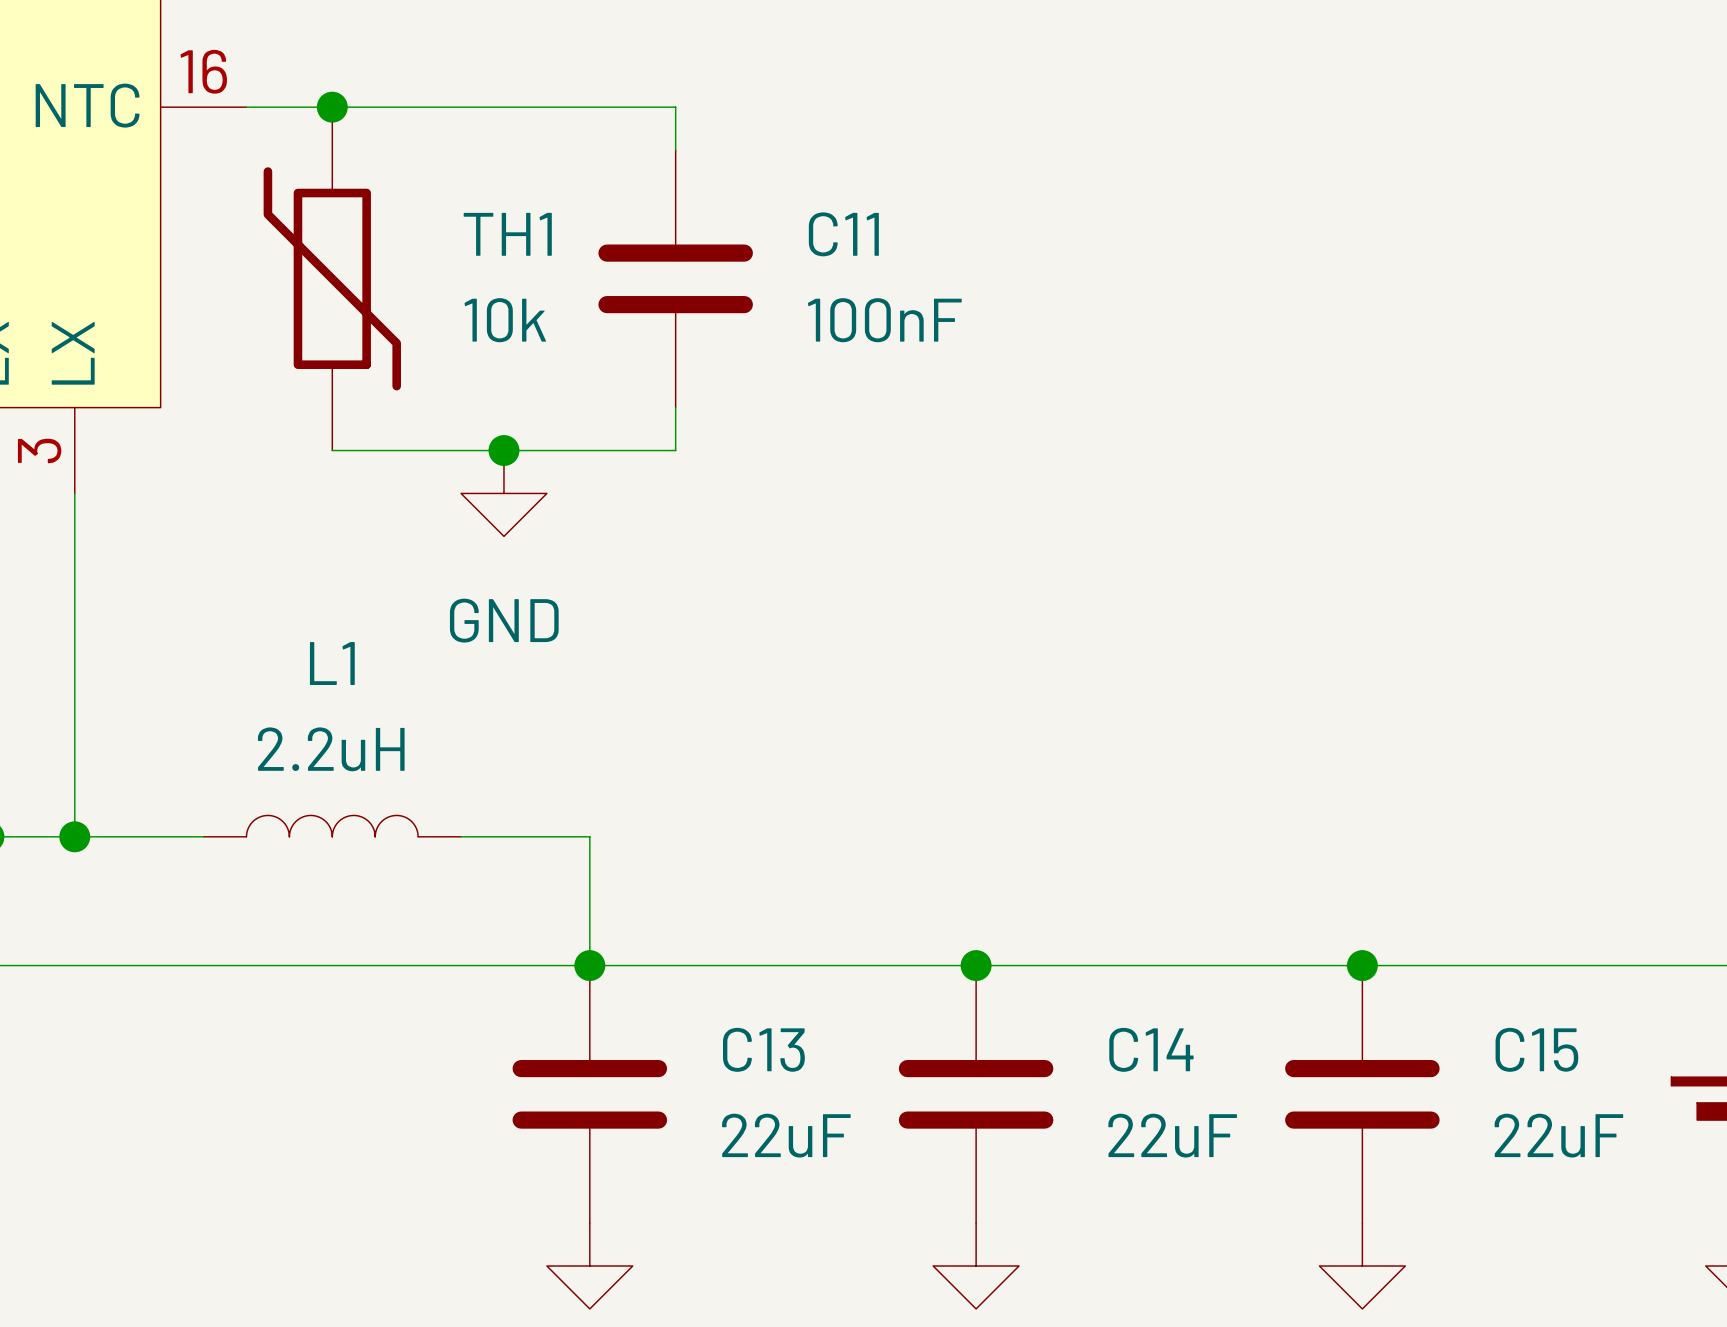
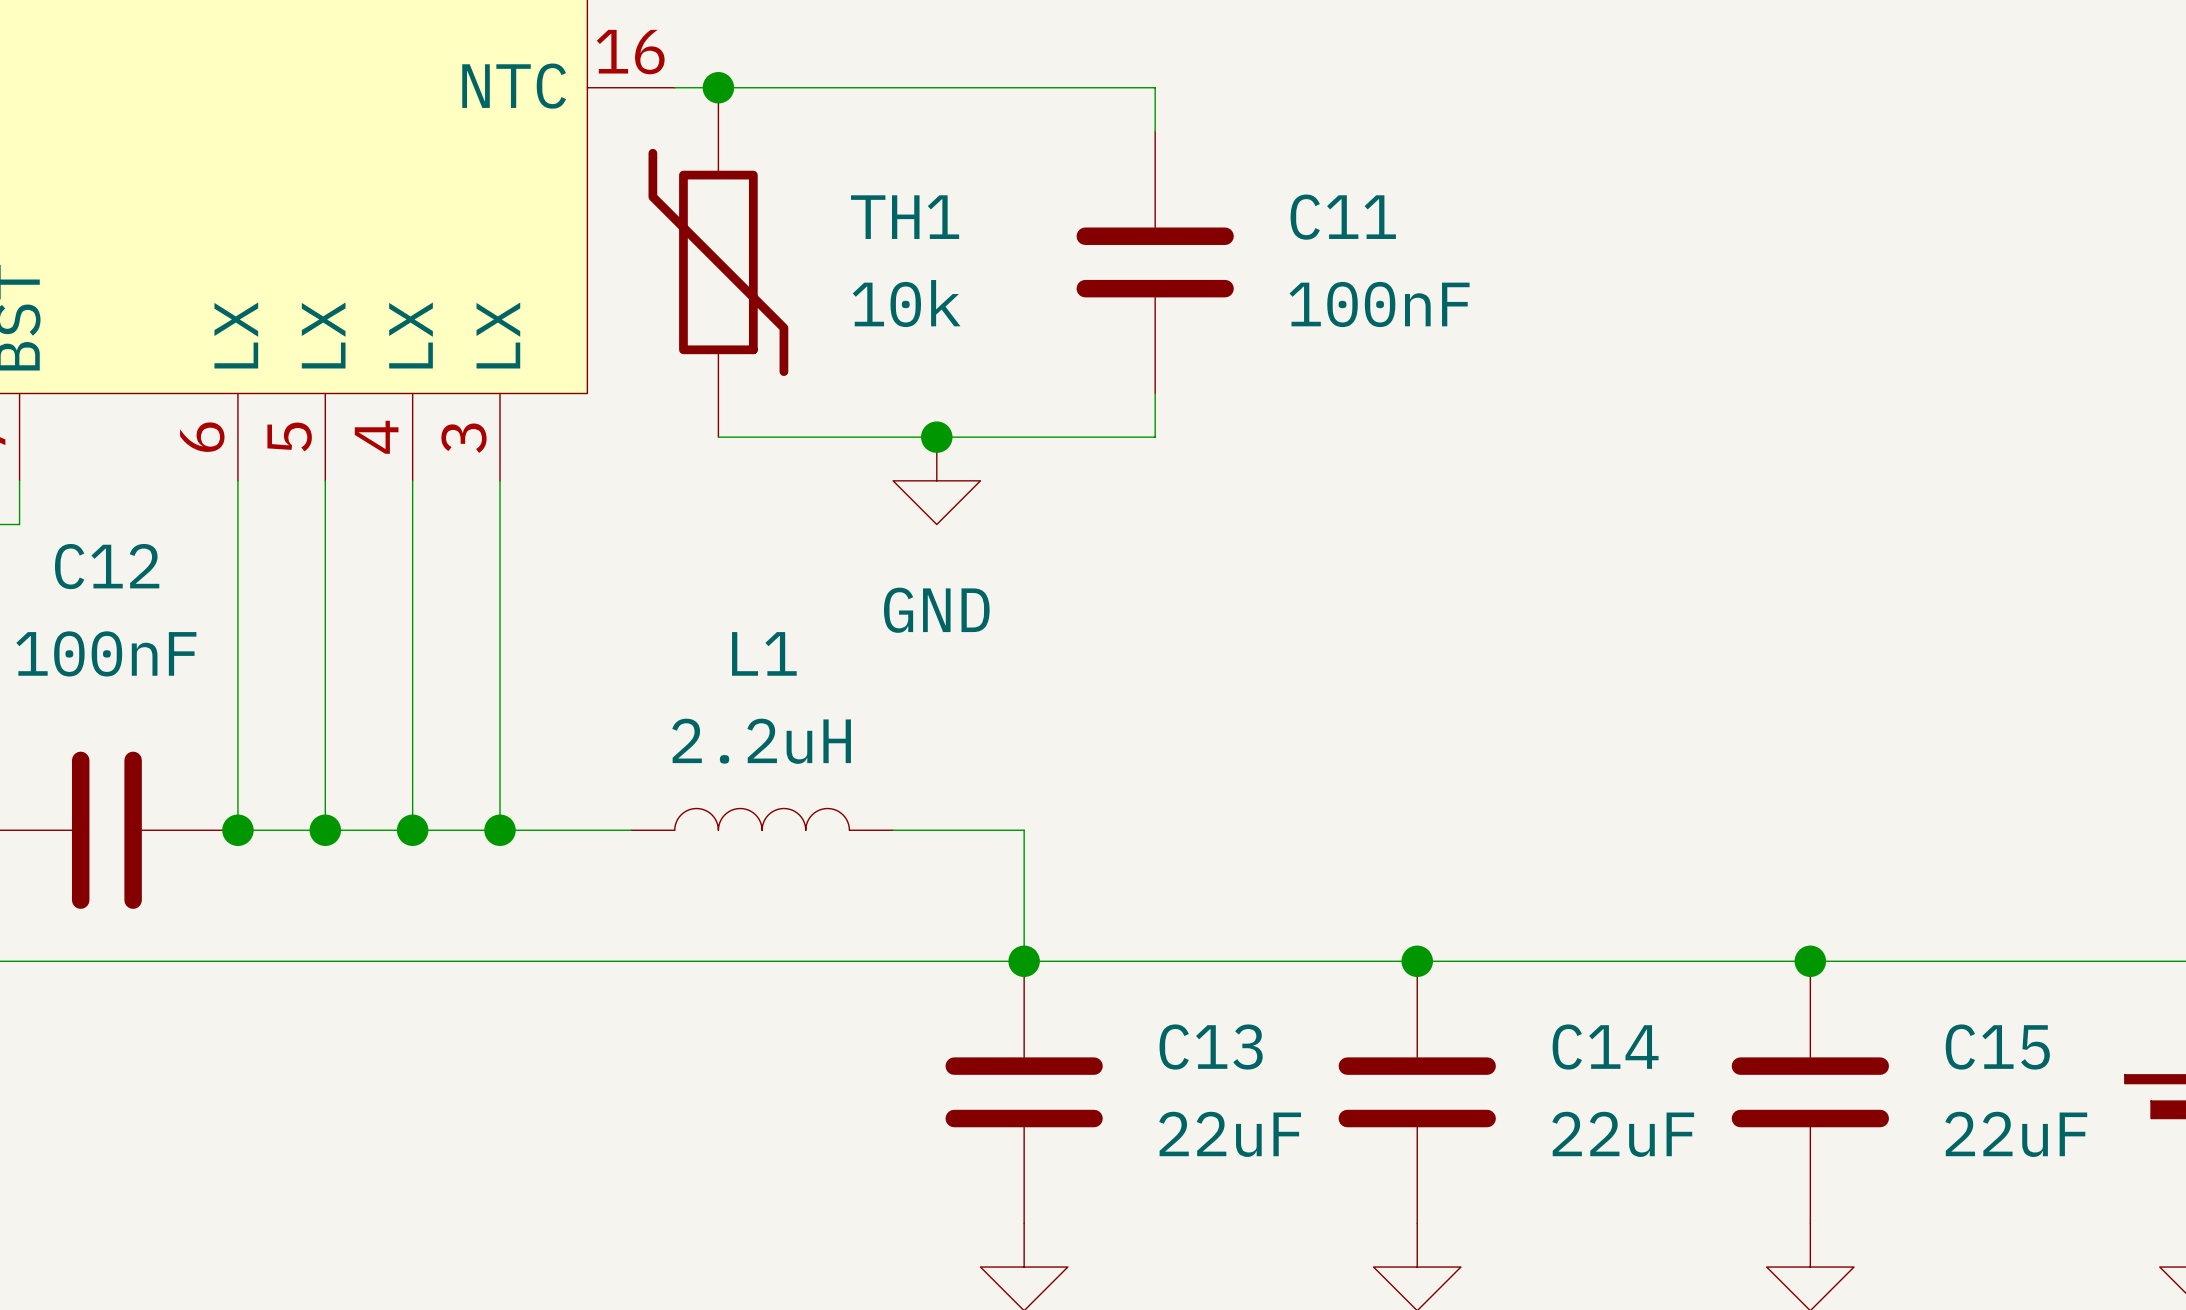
junction position: (332, 107) -> (718, 87)
wire: (675, 107) (675, 150) -> (1111, 87) (1155, 87) (1155, 131)
TH1 position: (332, 278) -> (718, 262)
C11 position: (675, 278) -> (1155, 262)
wire: (675, 407) (675, 450) -> (1155, 393) (1155, 437) (1111, 437)
wire: none -> (718, 437) (762, 437)

